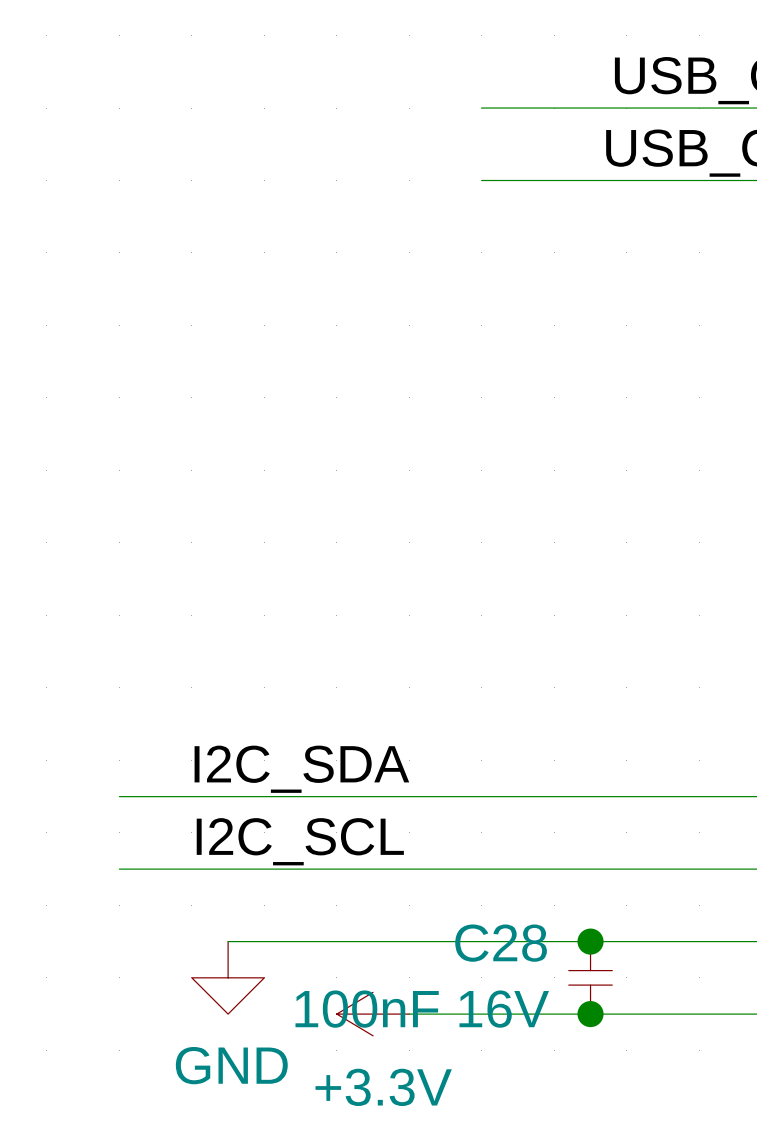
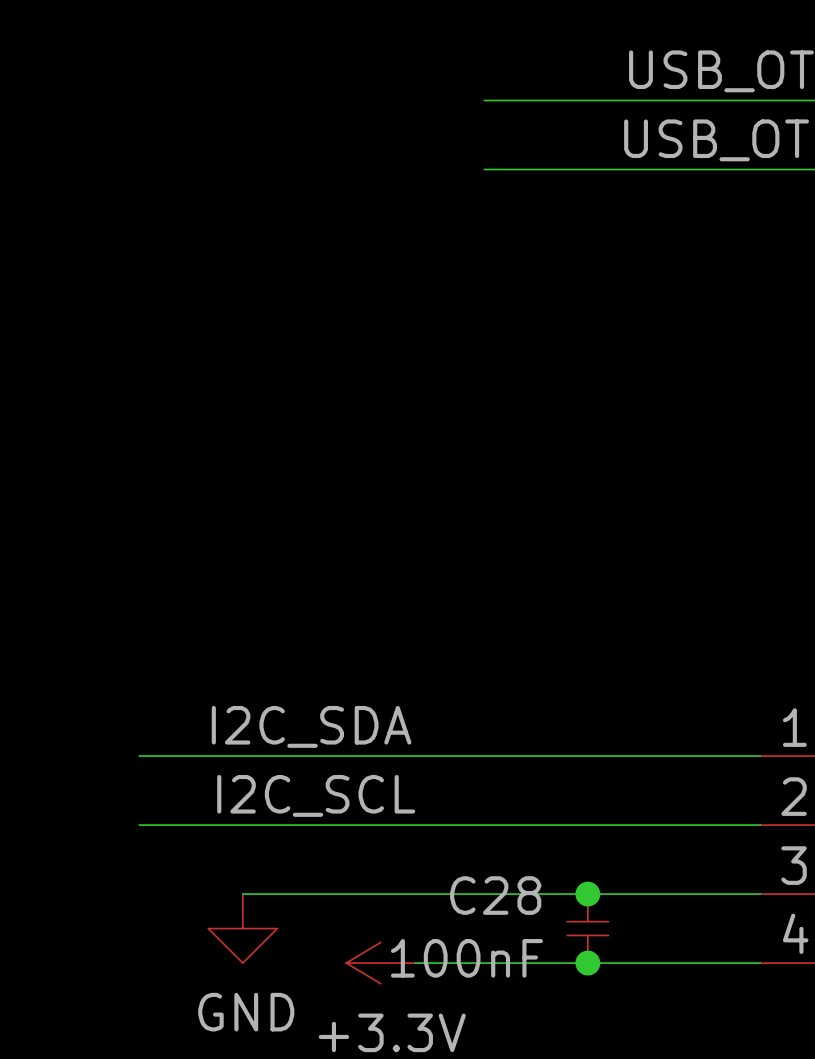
C28 value: 100nF 16V (422, 1009) -> 100nF (466, 958)

